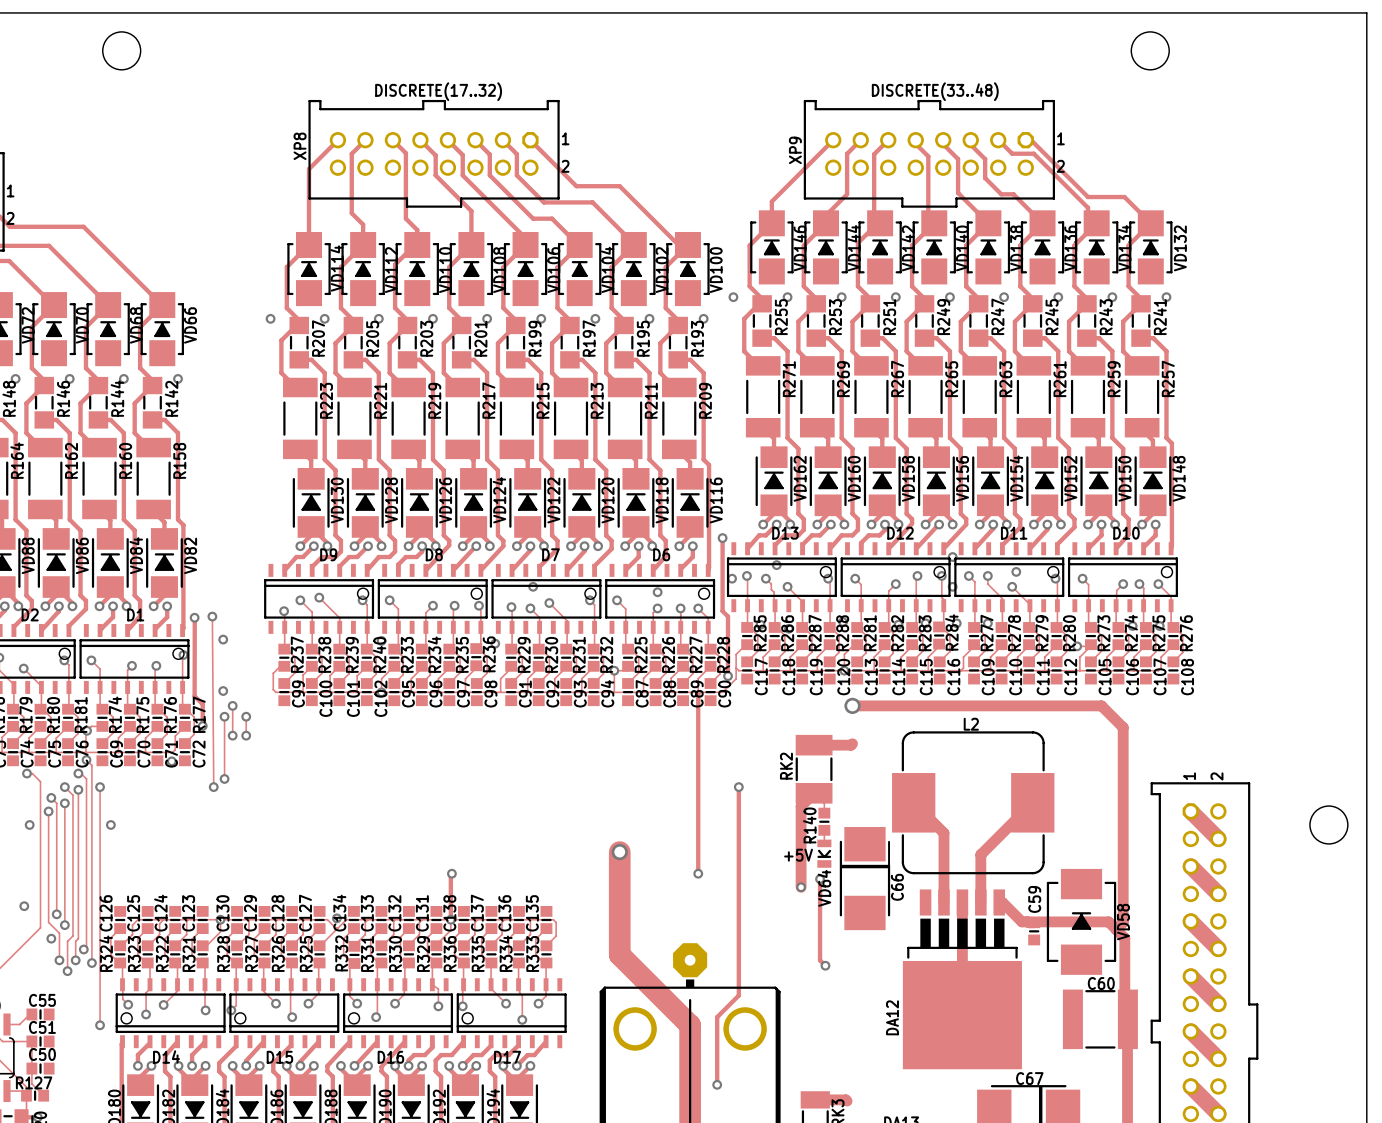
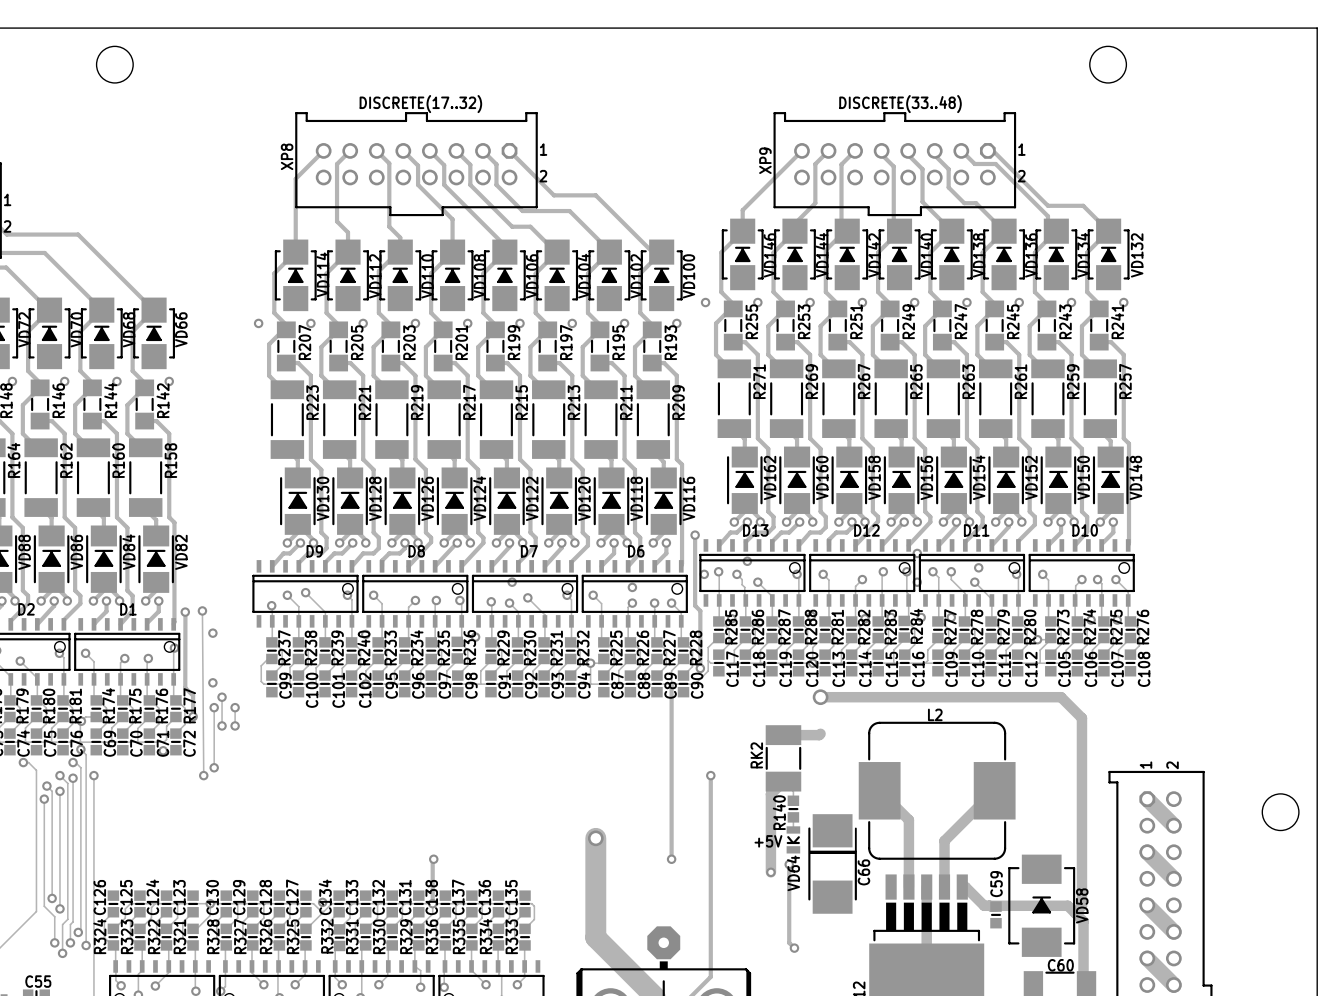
via: (29, 824) -> none
via: (110, 824) -> none
via: (24, 906) -> none
via: (51, 938) -> none

